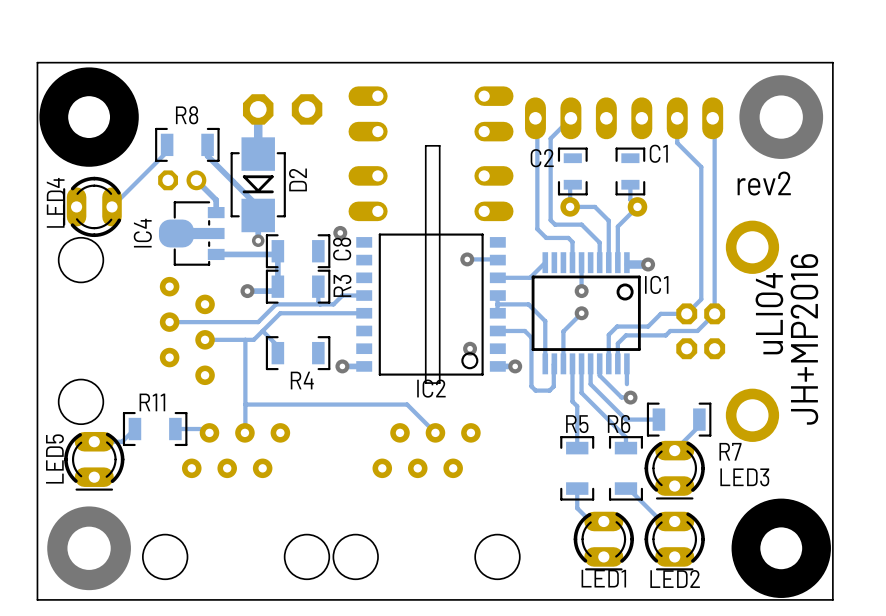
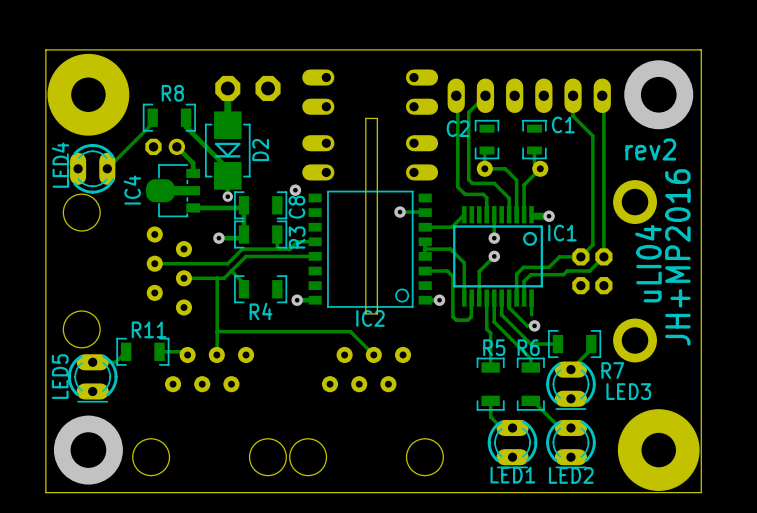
via: (470, 348) -> none

